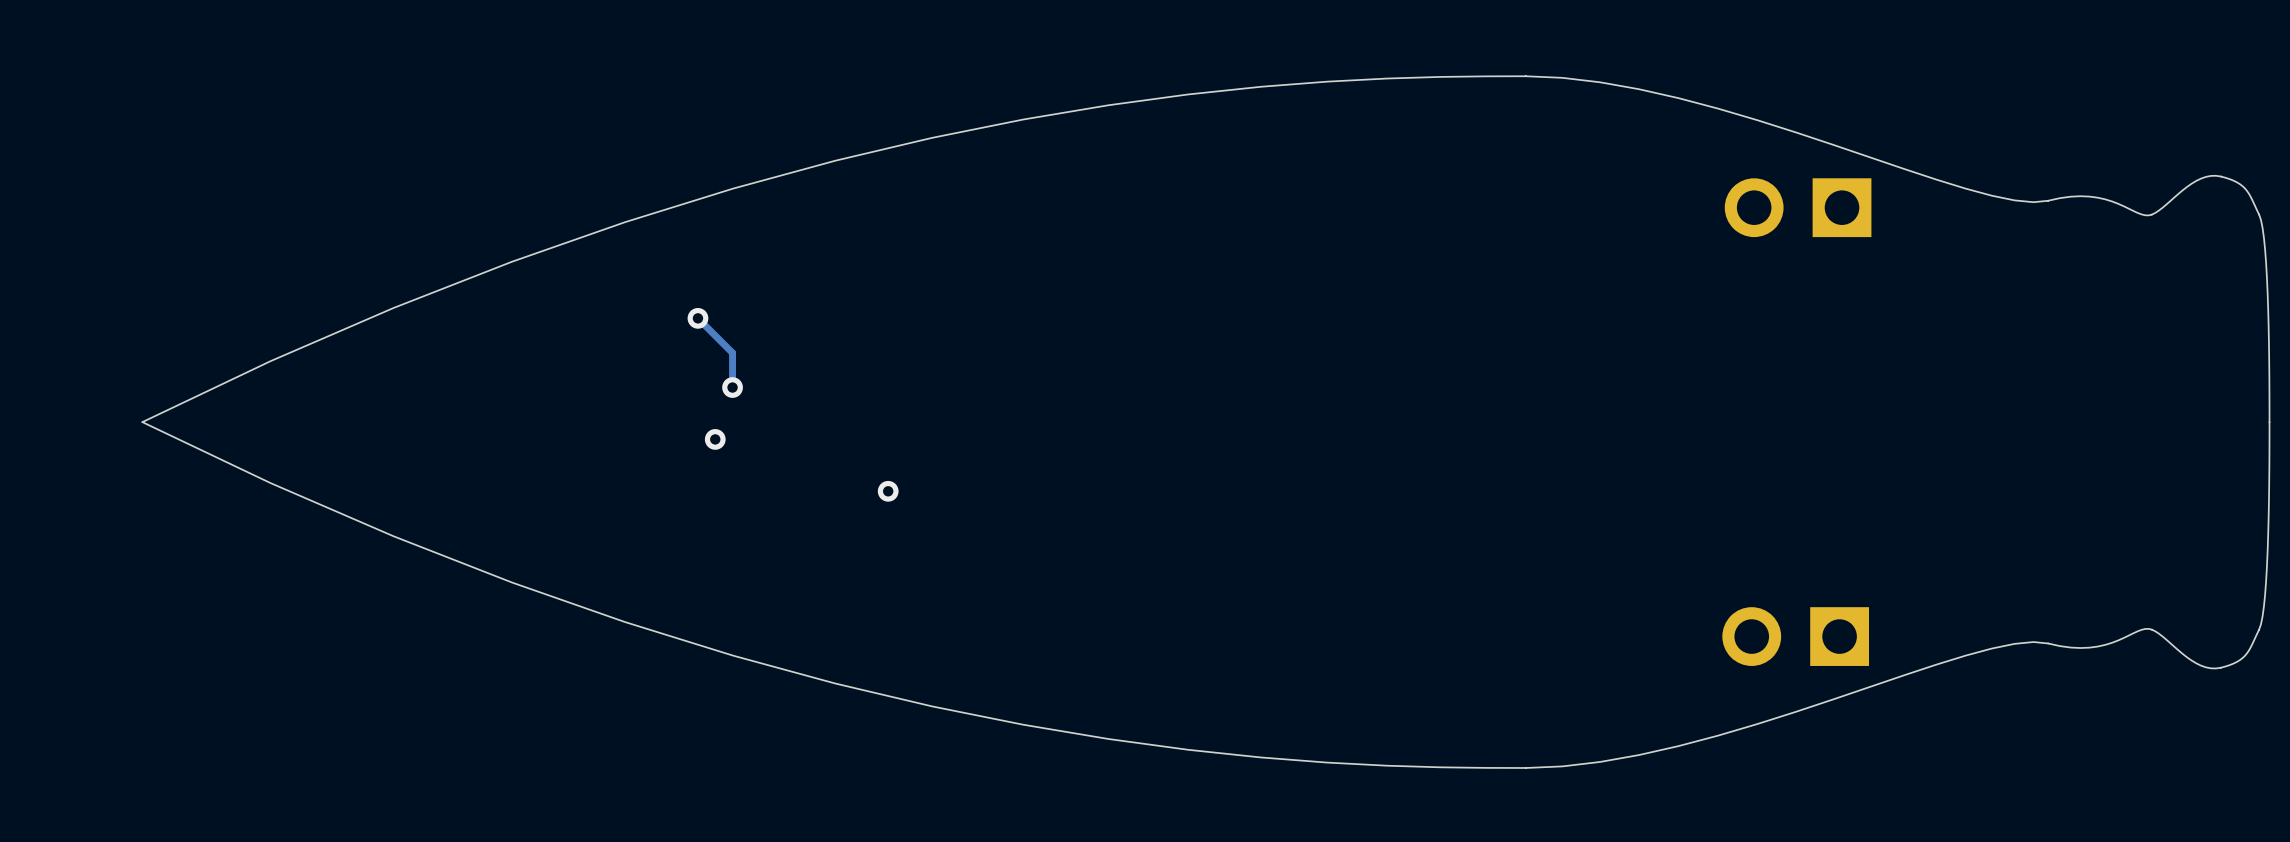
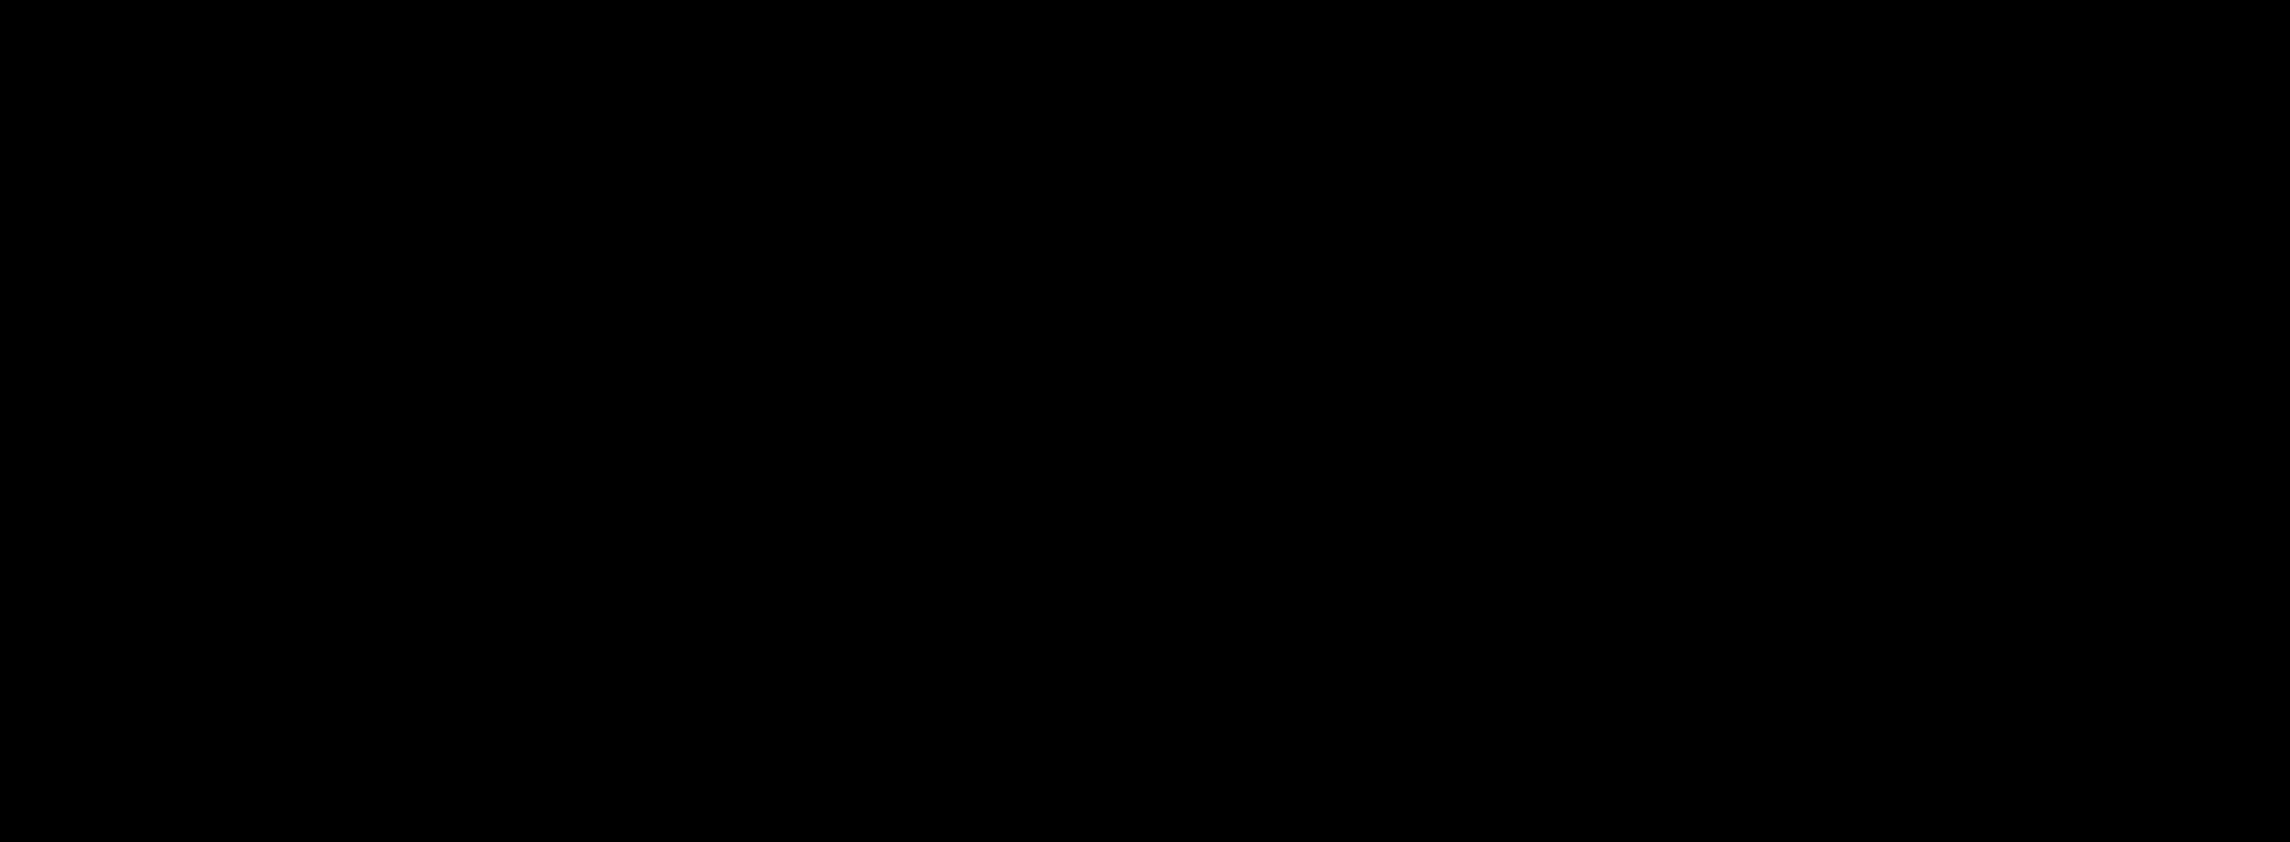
board edge: (1525, 76) (1600, 82) (1678, 98) (1757, 120) (1965, 188) (2014, 200) (2033, 202) (2070, 196) (2089, 196) (2112, 201) (2137, 212) (2148, 215) (2158, 210) (2191, 183) (2205, 176) (2221, 176) (2242, 186) (2252, 200) (2262, 227) (2266, 278) (2269, 375) (2268, 500) (2265, 594) (2260, 624) (2246, 653) (2237, 661) (2225, 666) (2215, 668) (2205, 667) (2191, 660) (2158, 633) (2148, 628) (2137, 631) (2112, 642) (2089, 647) (2070, 647) (2033, 642) (2014, 643) (1936, 664) (1718, 735) (1639, 755) (1562, 766) (1486, 767) (1387, 765) (1260, 757) (1187, 749) (1023, 724) (932, 706) (835, 683) (733, 655) (625, 622) (511, 582) (393, 536) (270, 483) (142, 422) (270, 361) (393, 307) (511, 261) (625, 222) (733, 188) (835, 160) (932, 137) (1023, 119) (1187, 94) (1327, 81) (1440, 76) (1525, 76) -> none
part: (1798, 207) -> none
track: (697, 318) (732, 352) (732, 387) -> none
via: (697, 318) -> none
via: (732, 387) -> none
via: (715, 439) -> none
via: (888, 491) -> none
part: (1795, 636) -> none

